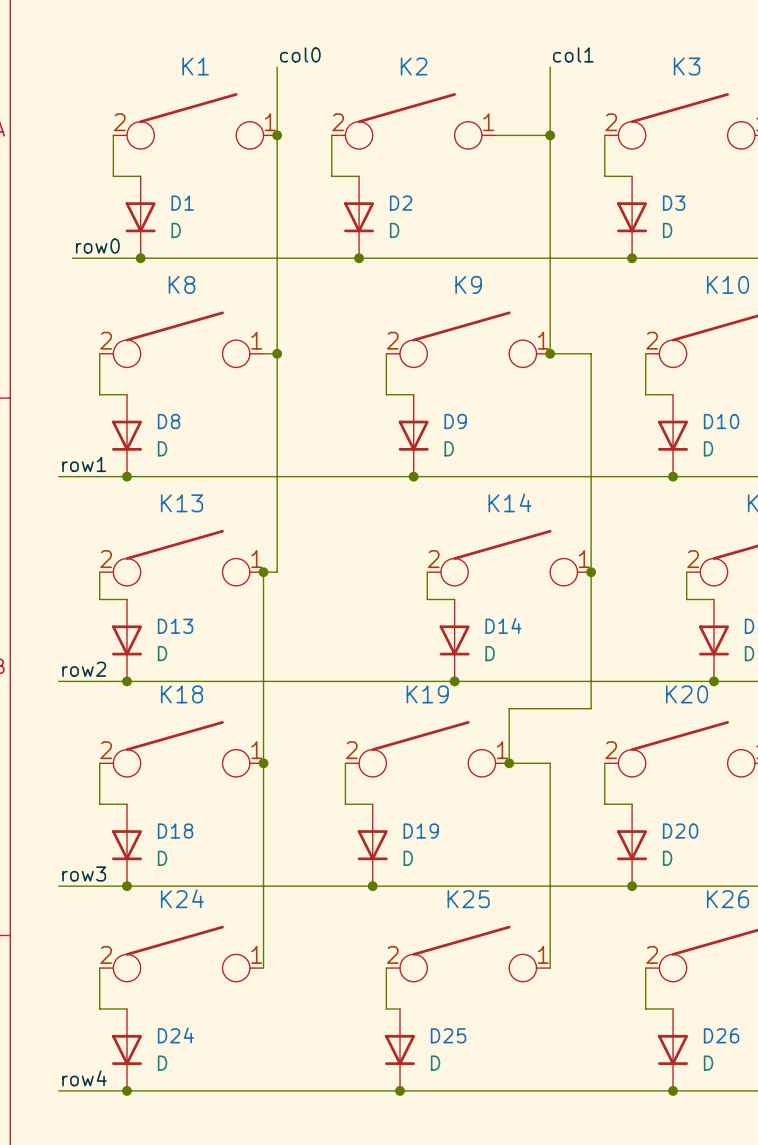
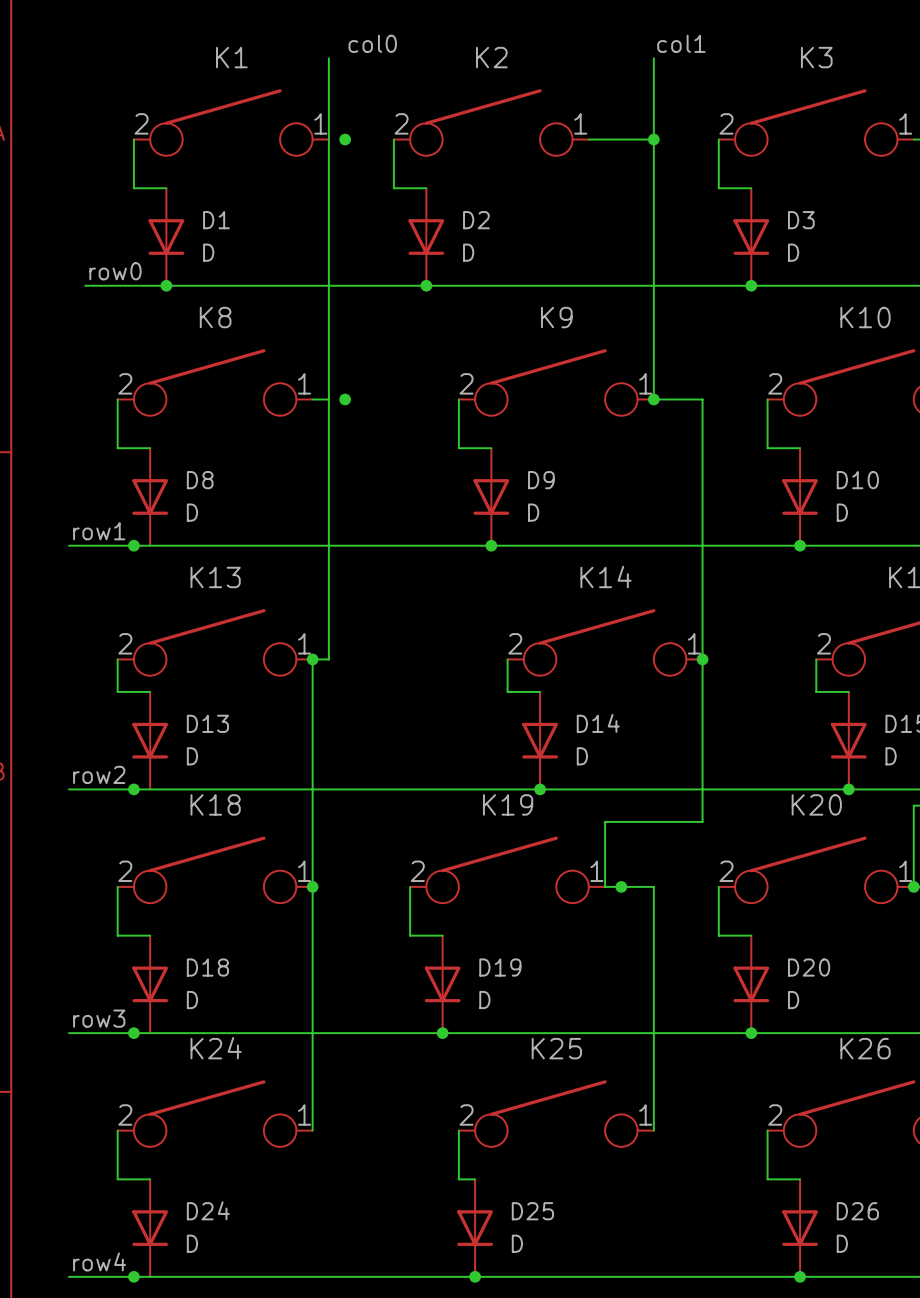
label position: col0 (300, 54) -> col0 (372, 43)
junction position: (277, 135) -> (345, 139)
junction position: (277, 353) -> (345, 399)
junction position: (127, 476) -> (133, 545)
junction position: (127, 681) -> (133, 789)
junction position: (509, 763) -> (621, 886)
junction position: (127, 886) -> (133, 1033)
junction position: (127, 1090) -> (133, 1276)

